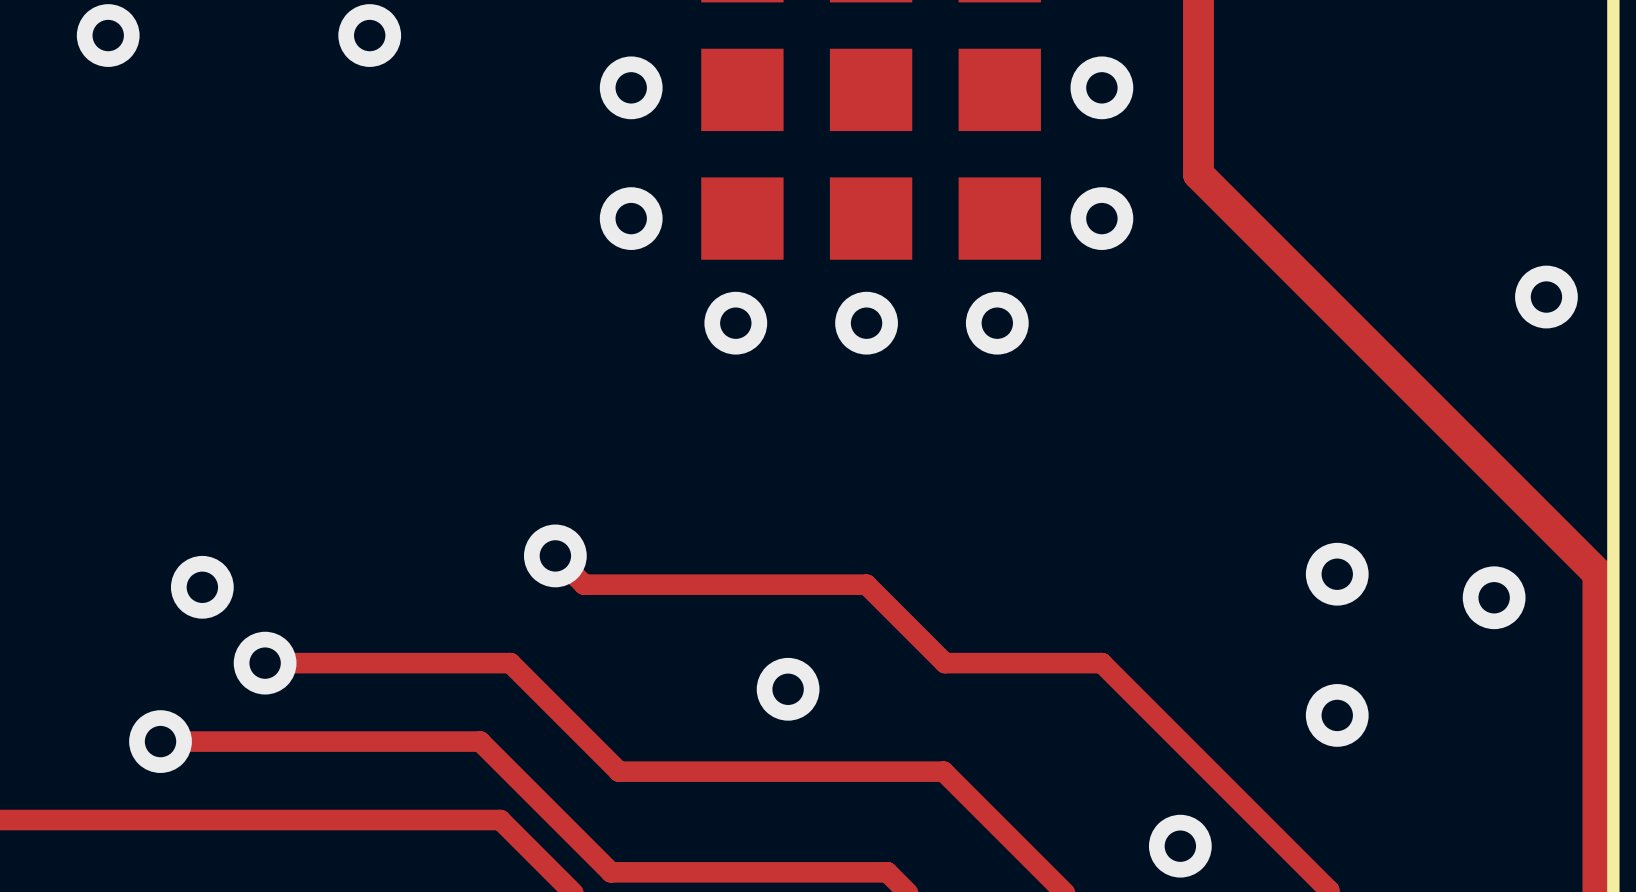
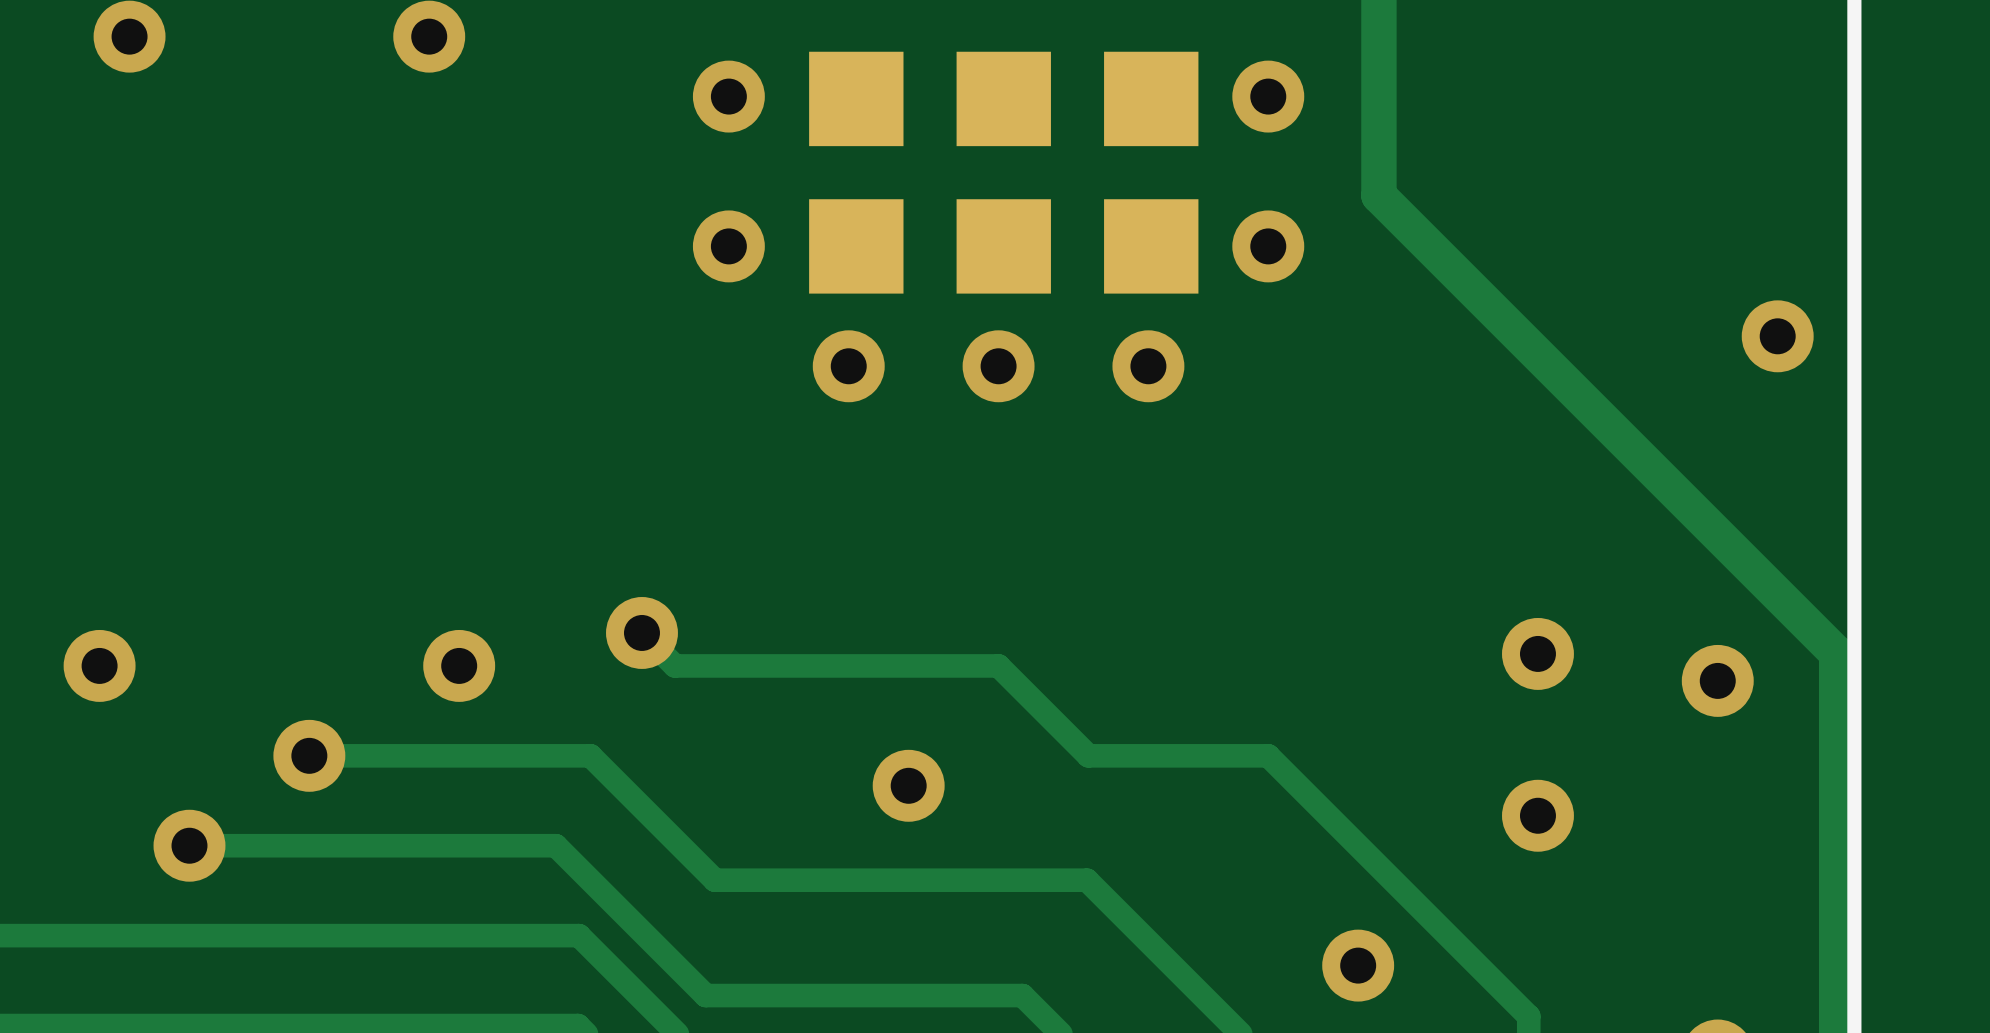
via: none -> (99, 665)
via: none -> (459, 665)
via: (202, 587) -> none

